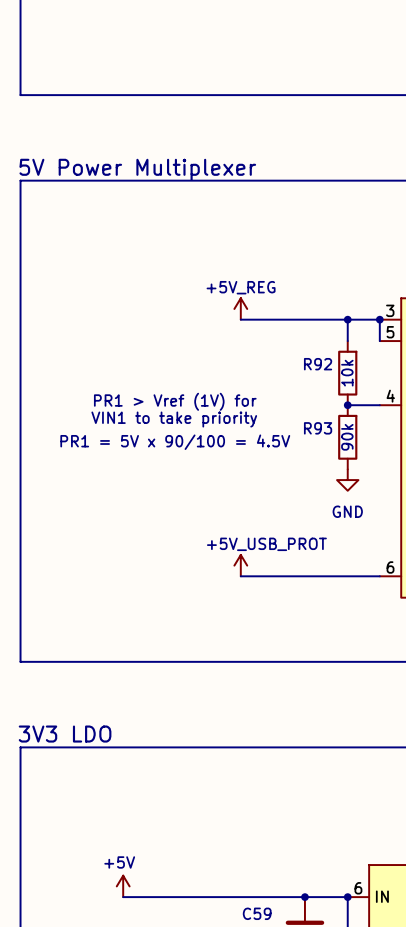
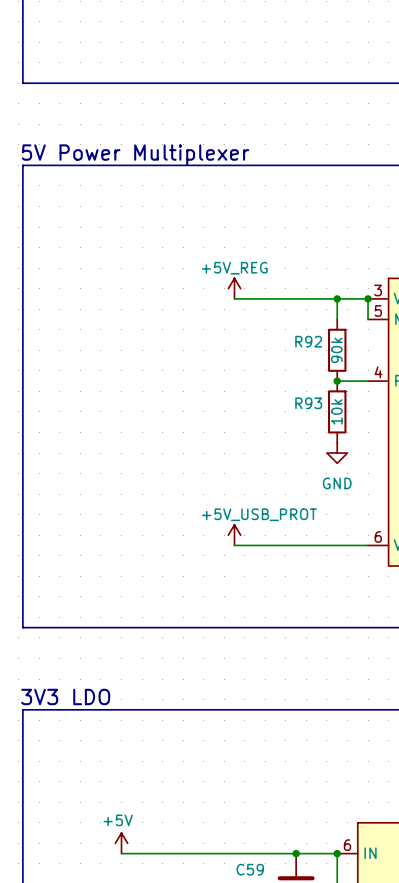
R92 value: 10k (347, 373) -> 90k (336, 350)
text: PR1 > Vref (1V) for (175, 401) -> none
text: VIN1 to take priority (174, 419) -> none
R93 value: 90k (347, 437) -> 10k (336, 411)
text: PR1 = 5V x 90/100 = 4.5V (175, 442) -> none

